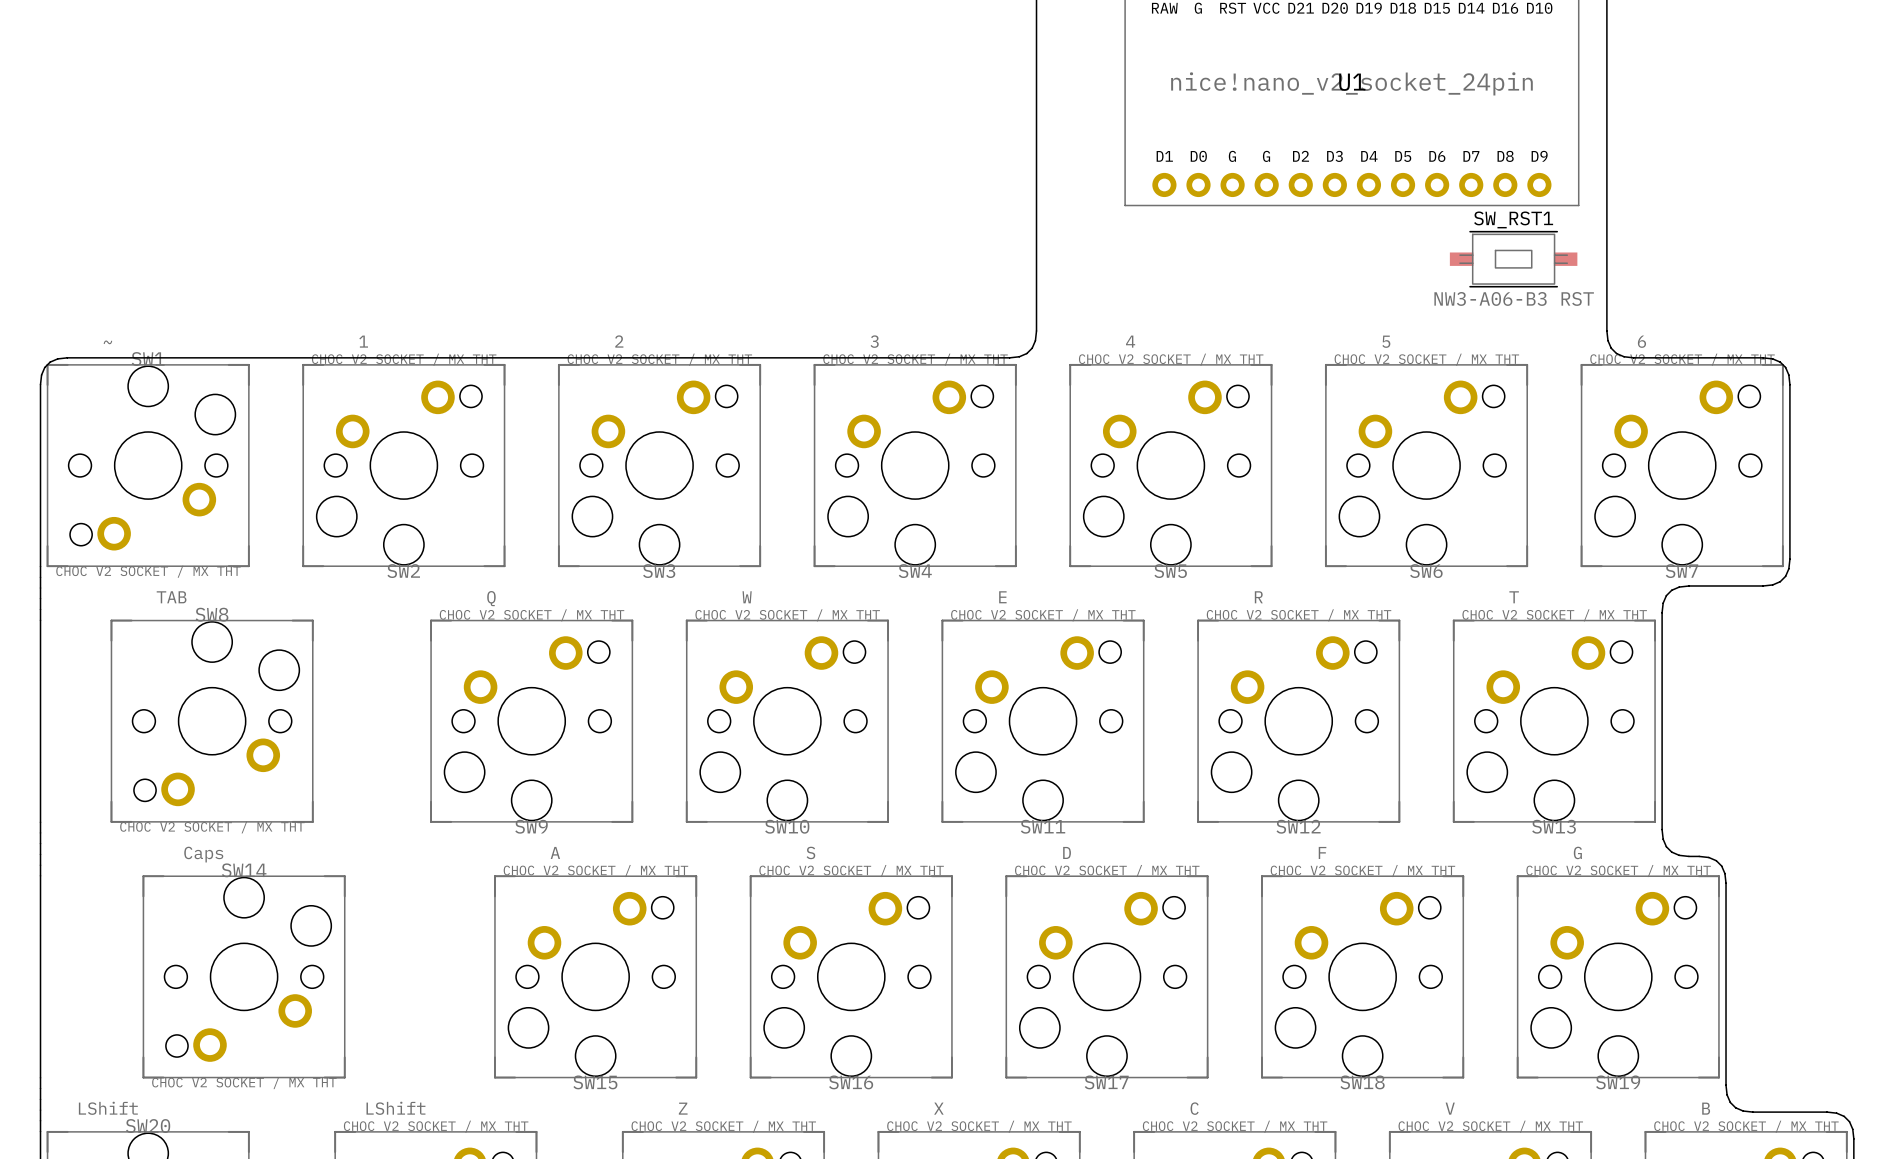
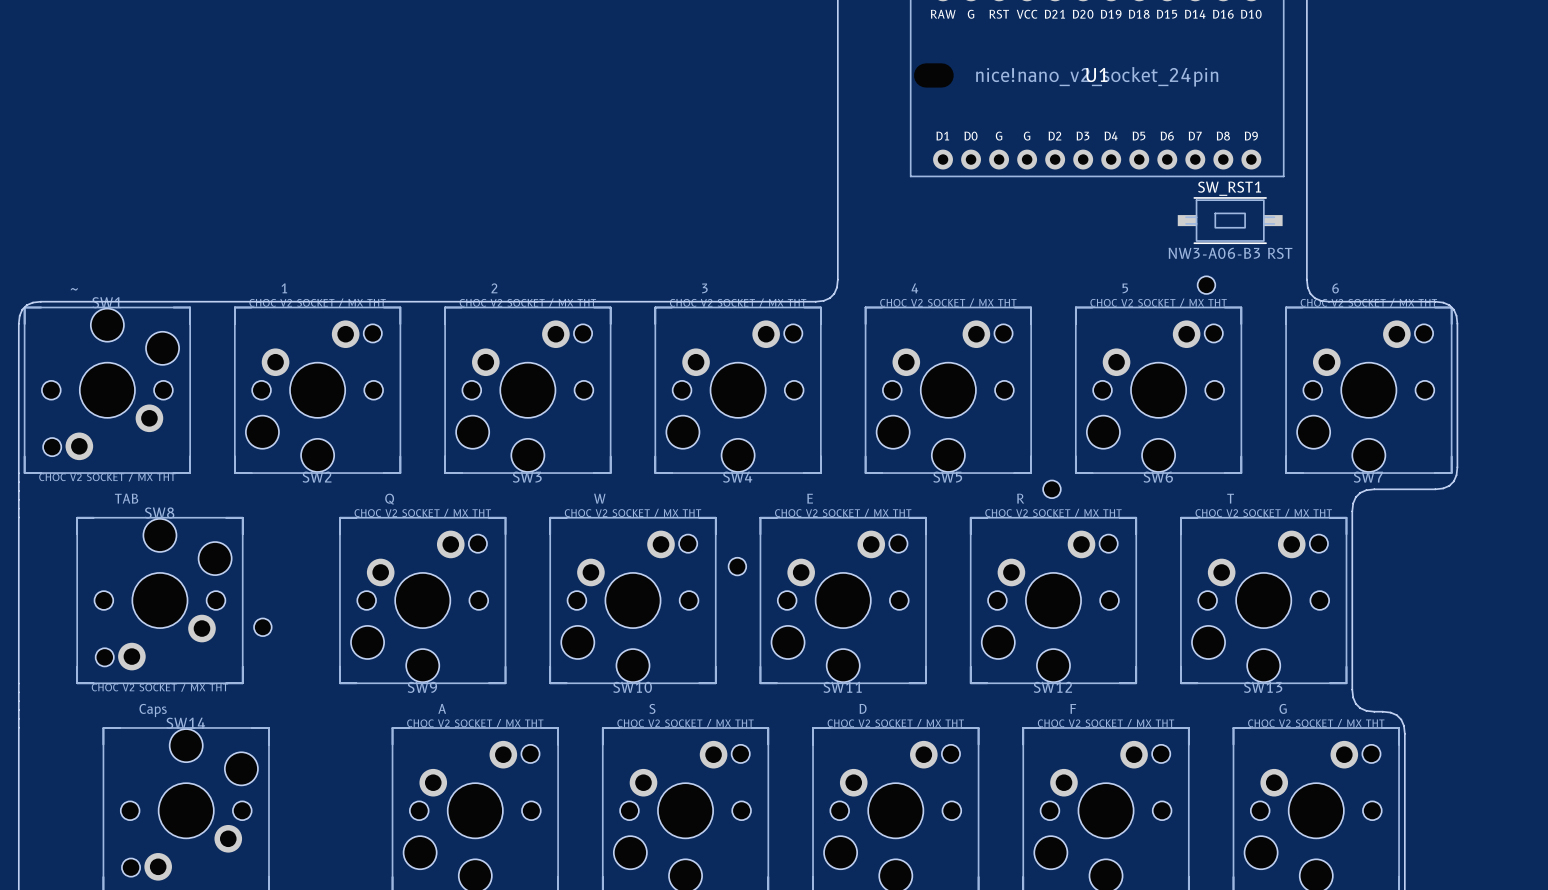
part: none -> (1206, 285)
part: none -> (1051, 489)
part: none -> (737, 566)
part: none -> (262, 627)

